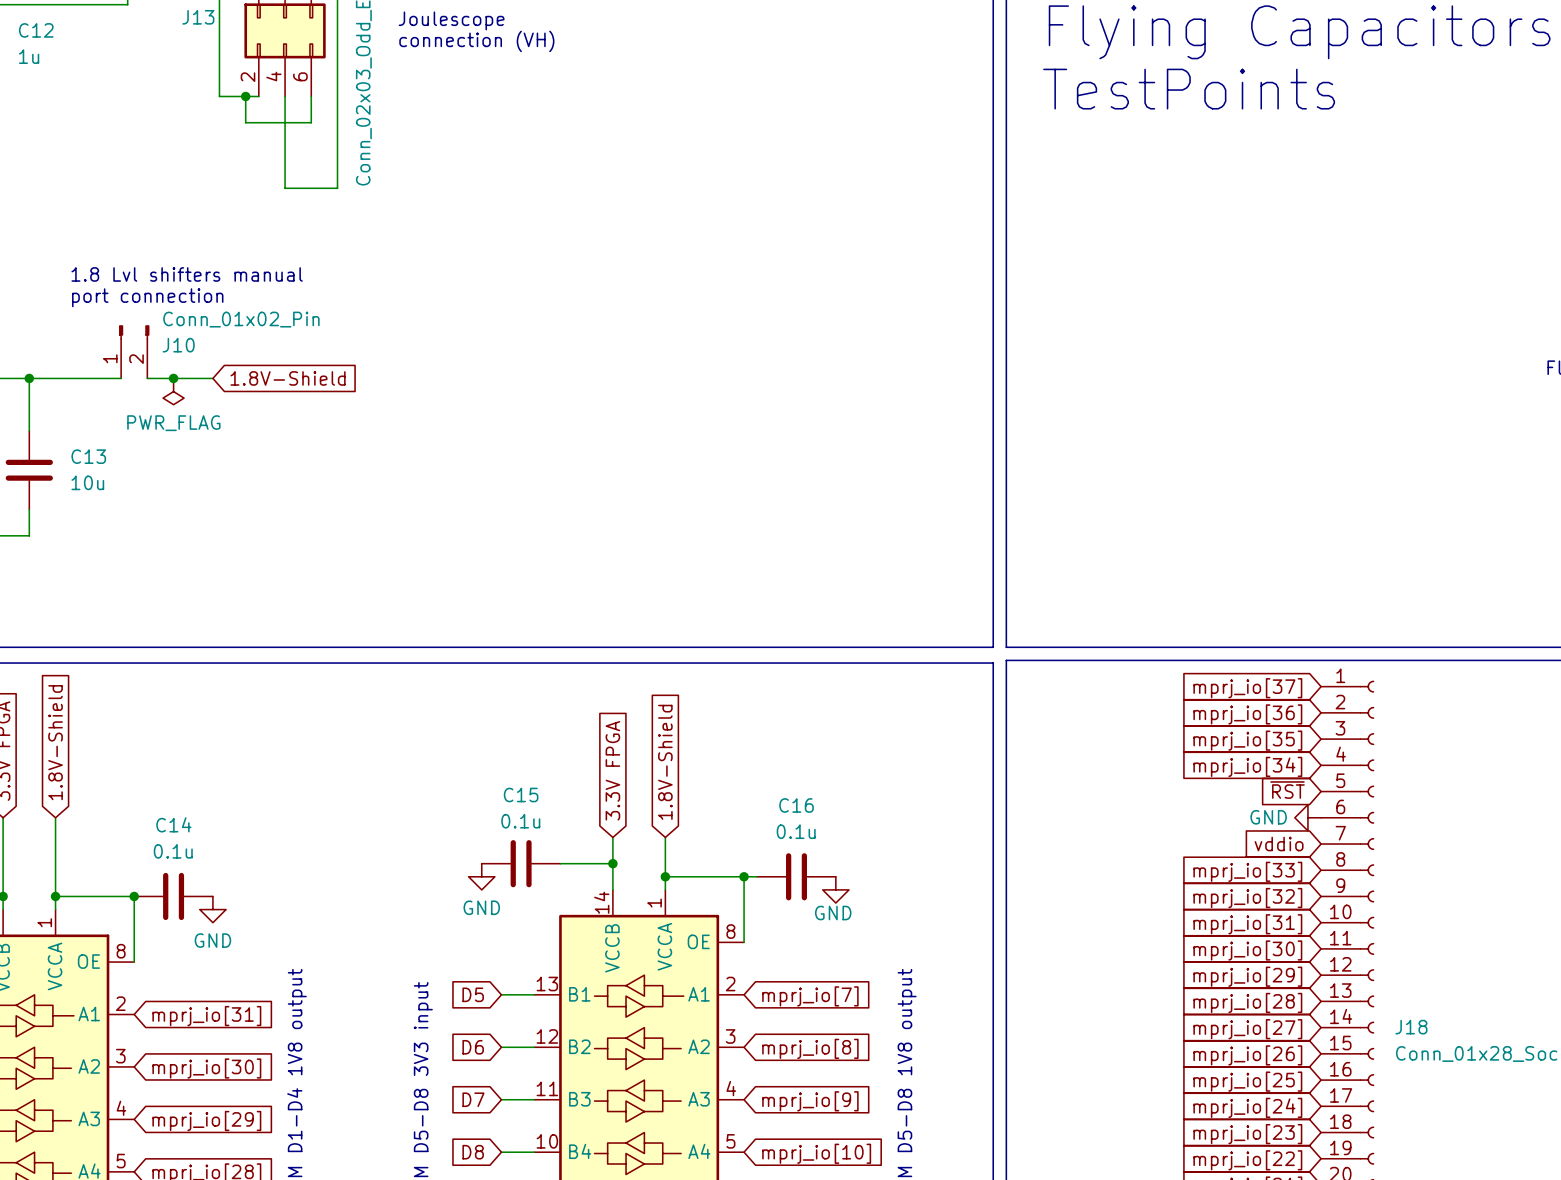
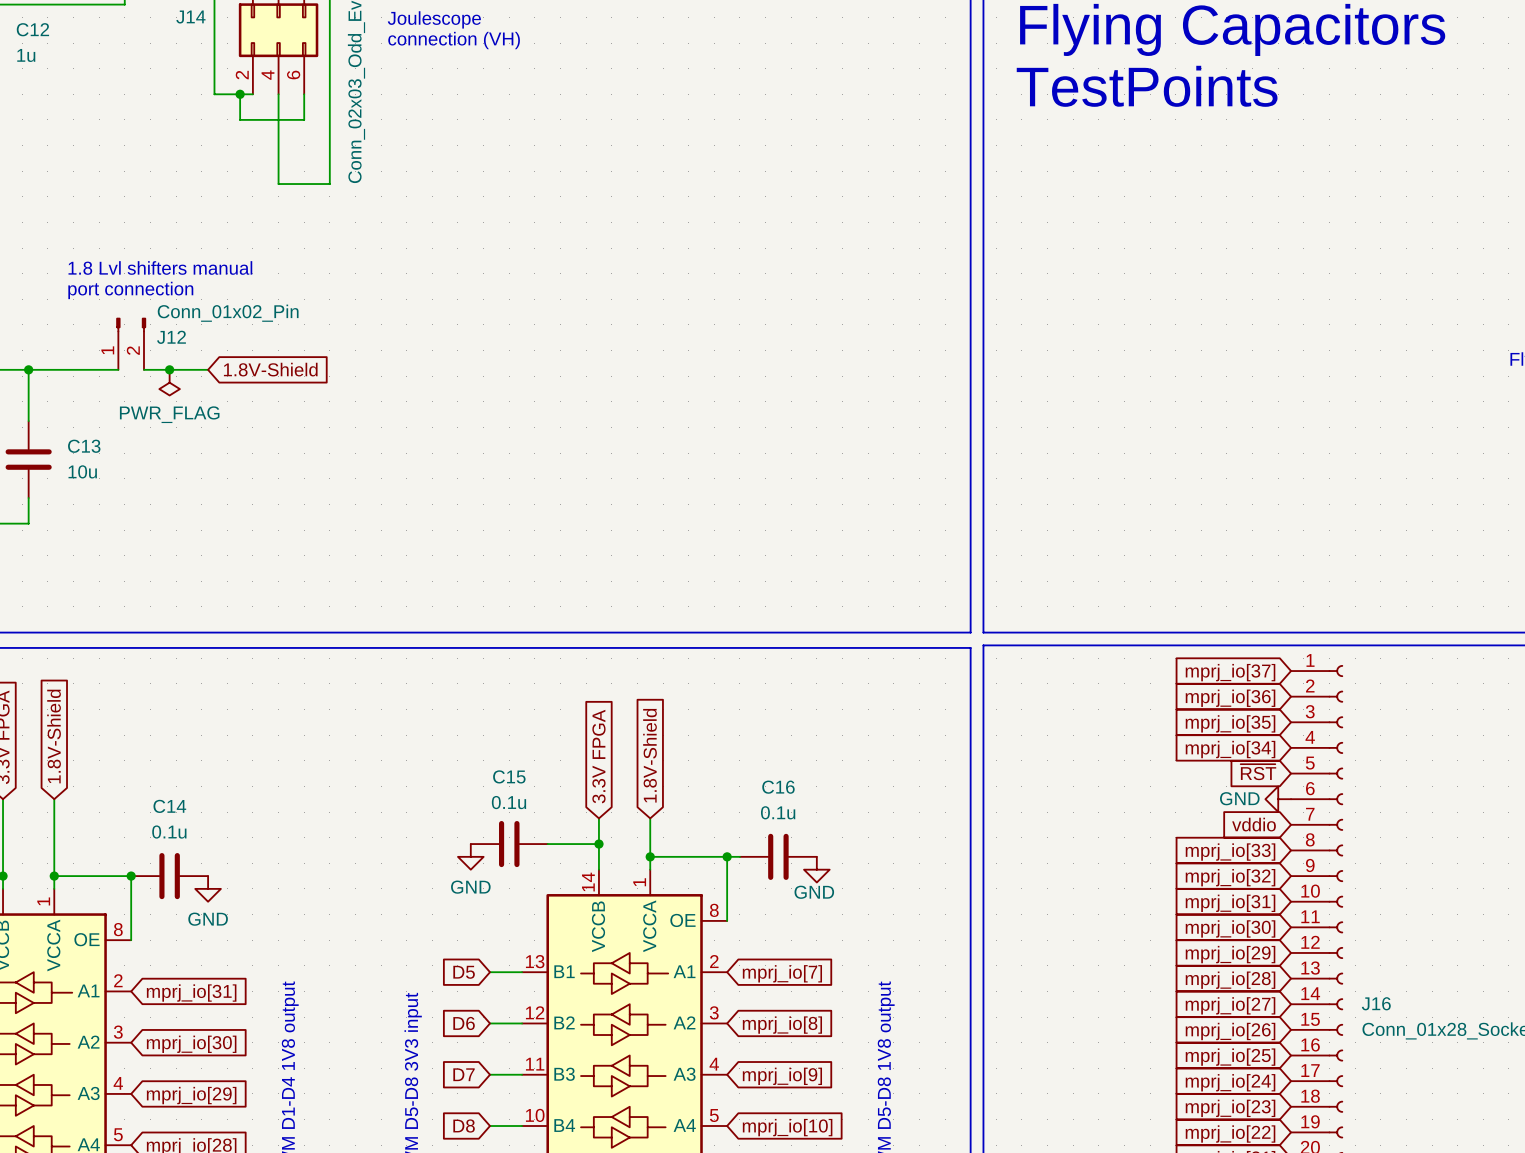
J13 name: J13 (198, 17) -> J14 (190, 17)
J10 name: J10 (178, 345) -> J12 (171, 337)
J18 name: J18 (1411, 1027) -> J16 (1376, 1003)

